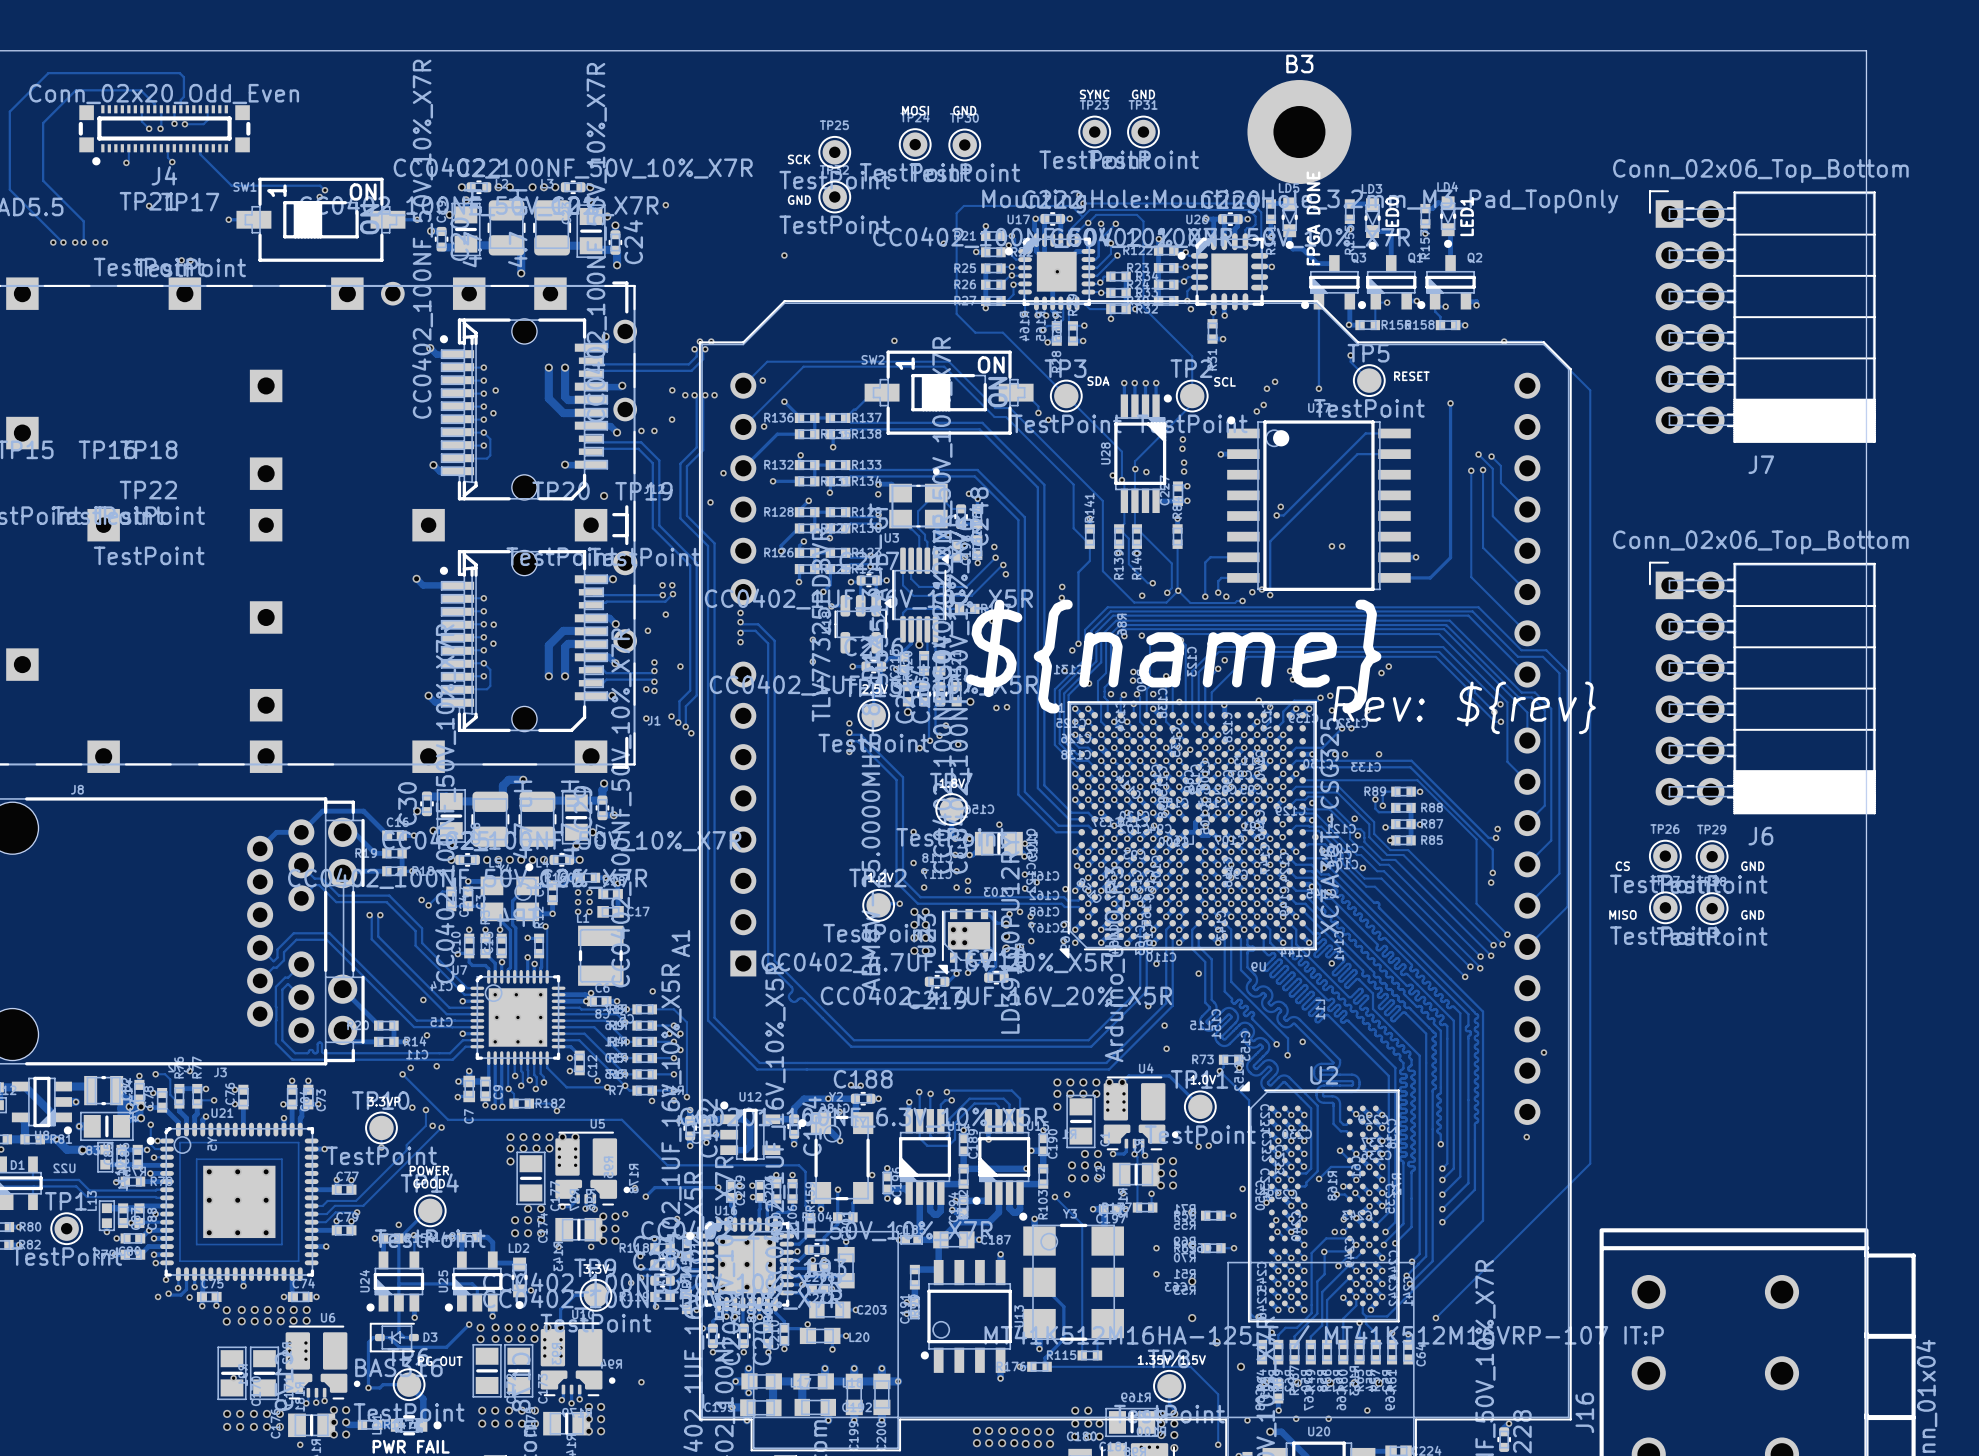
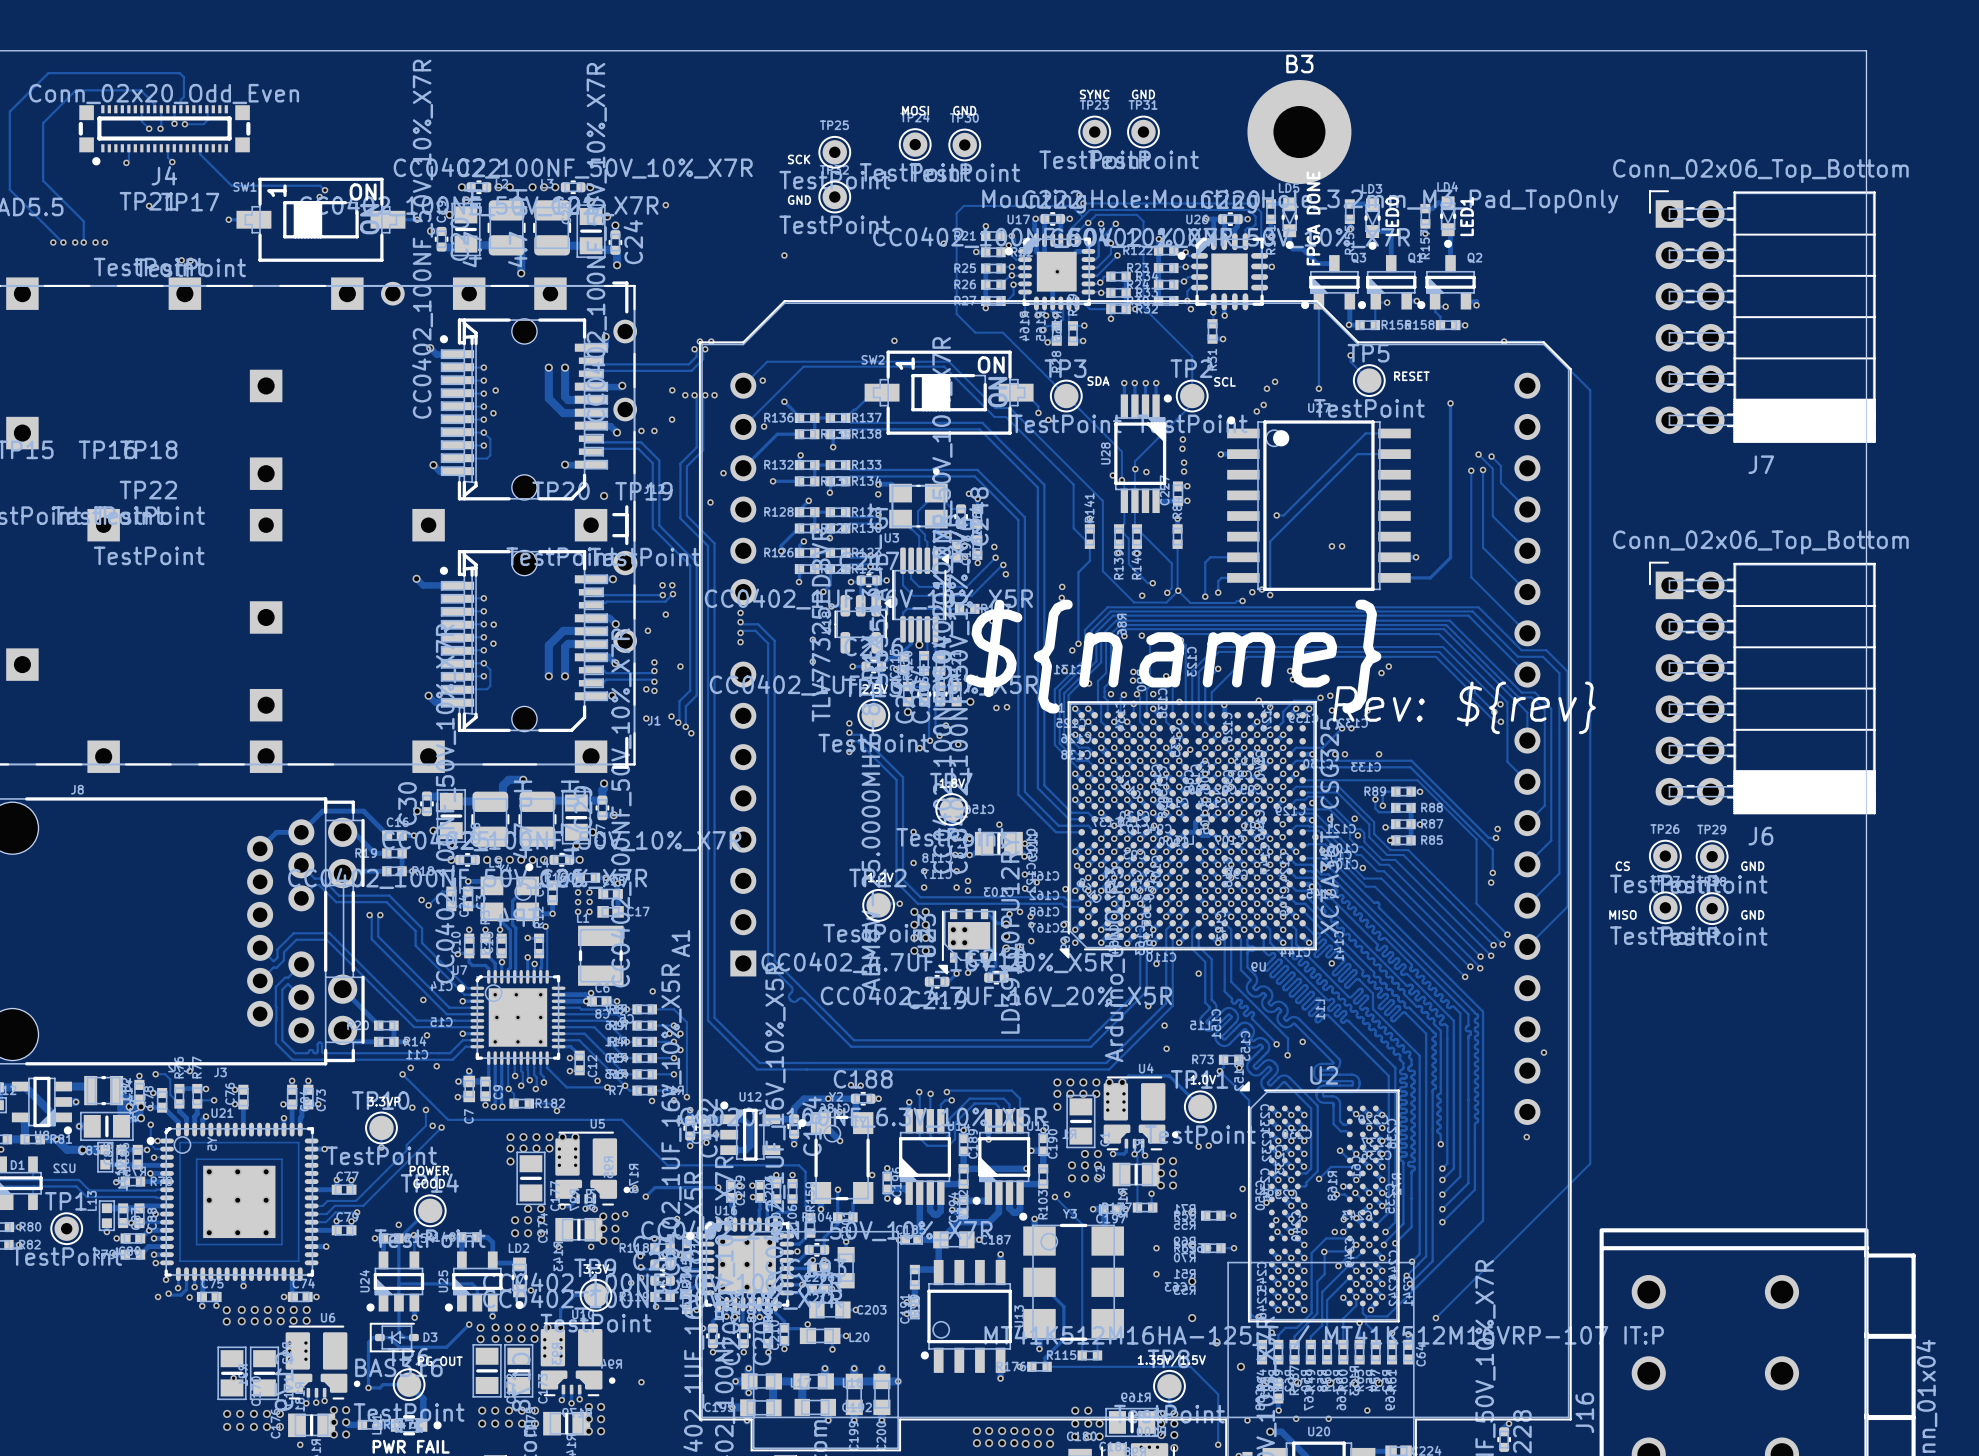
via: (1280, 506) -> none
via: (1226, 596) -> none
via: (1224, 660) -> none

